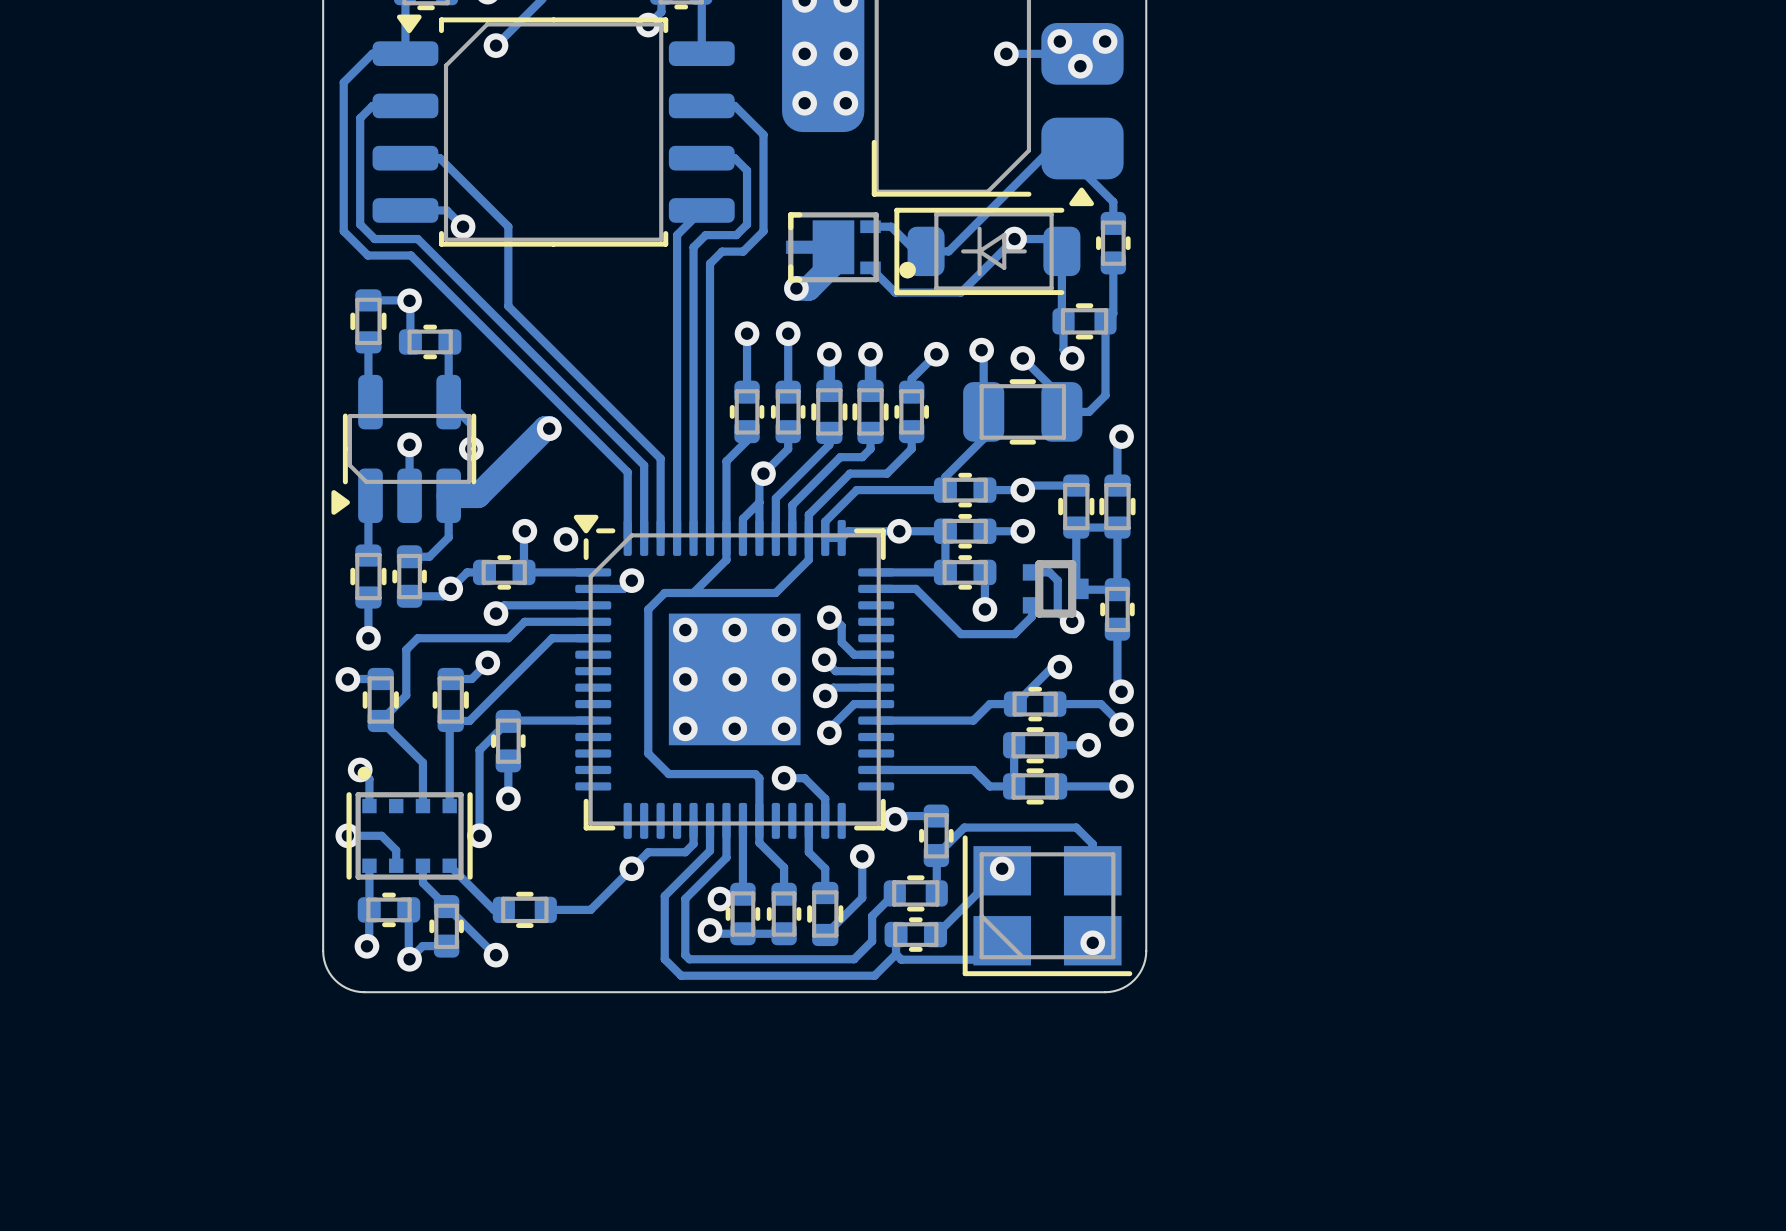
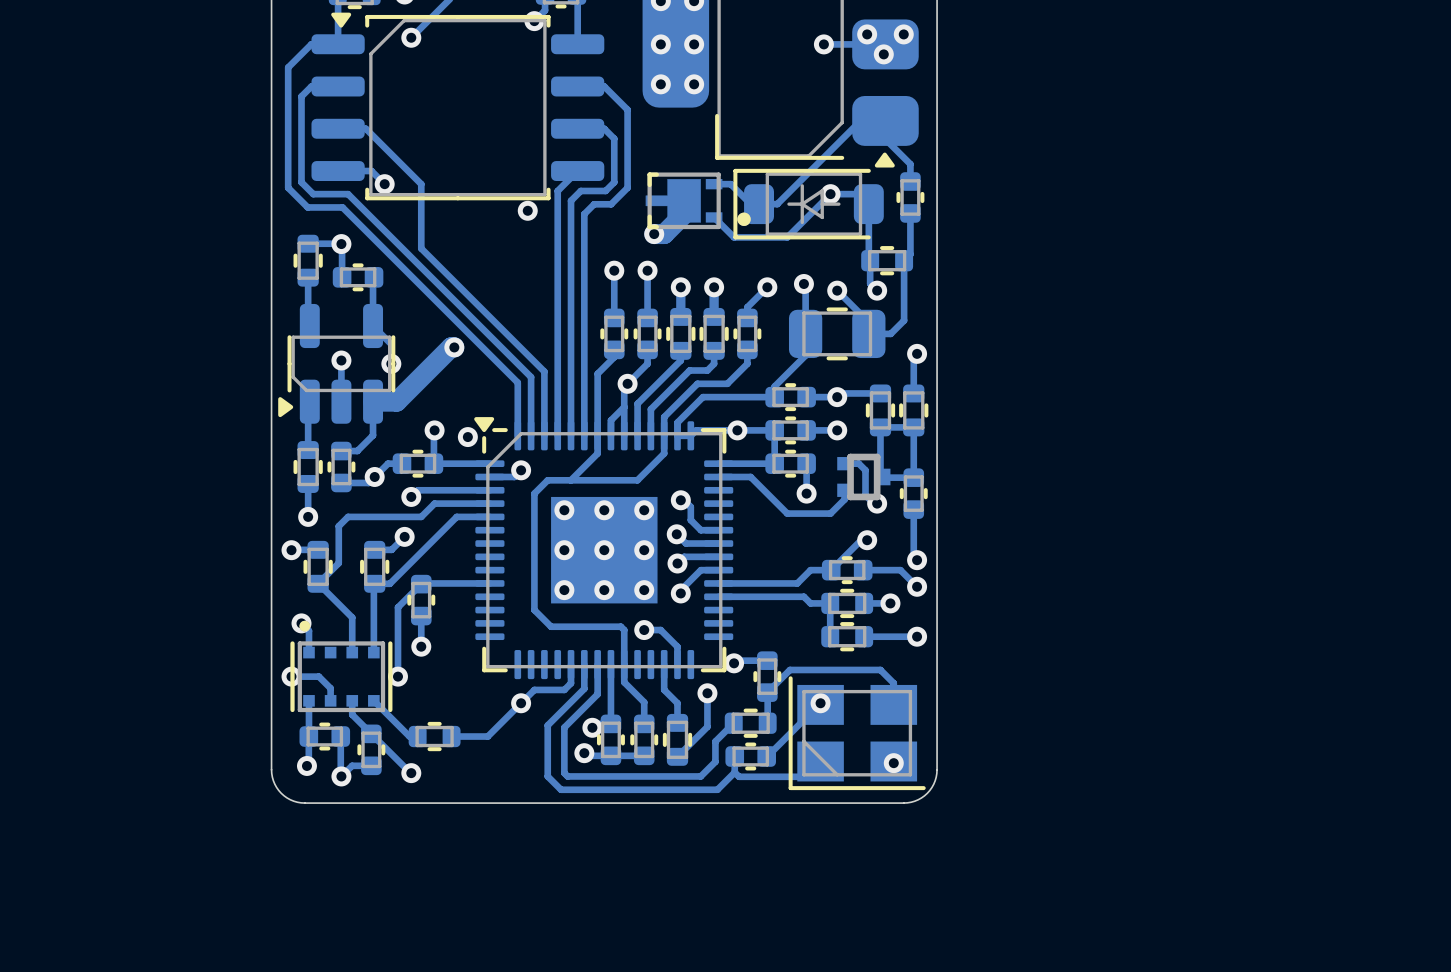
via: none -> (527, 210)
track: none -> (718, 596) (803, 596) (810, 603) (830, 603)
track: (876, 769) (973, 769) (989, 786) (1014, 786) -> none

